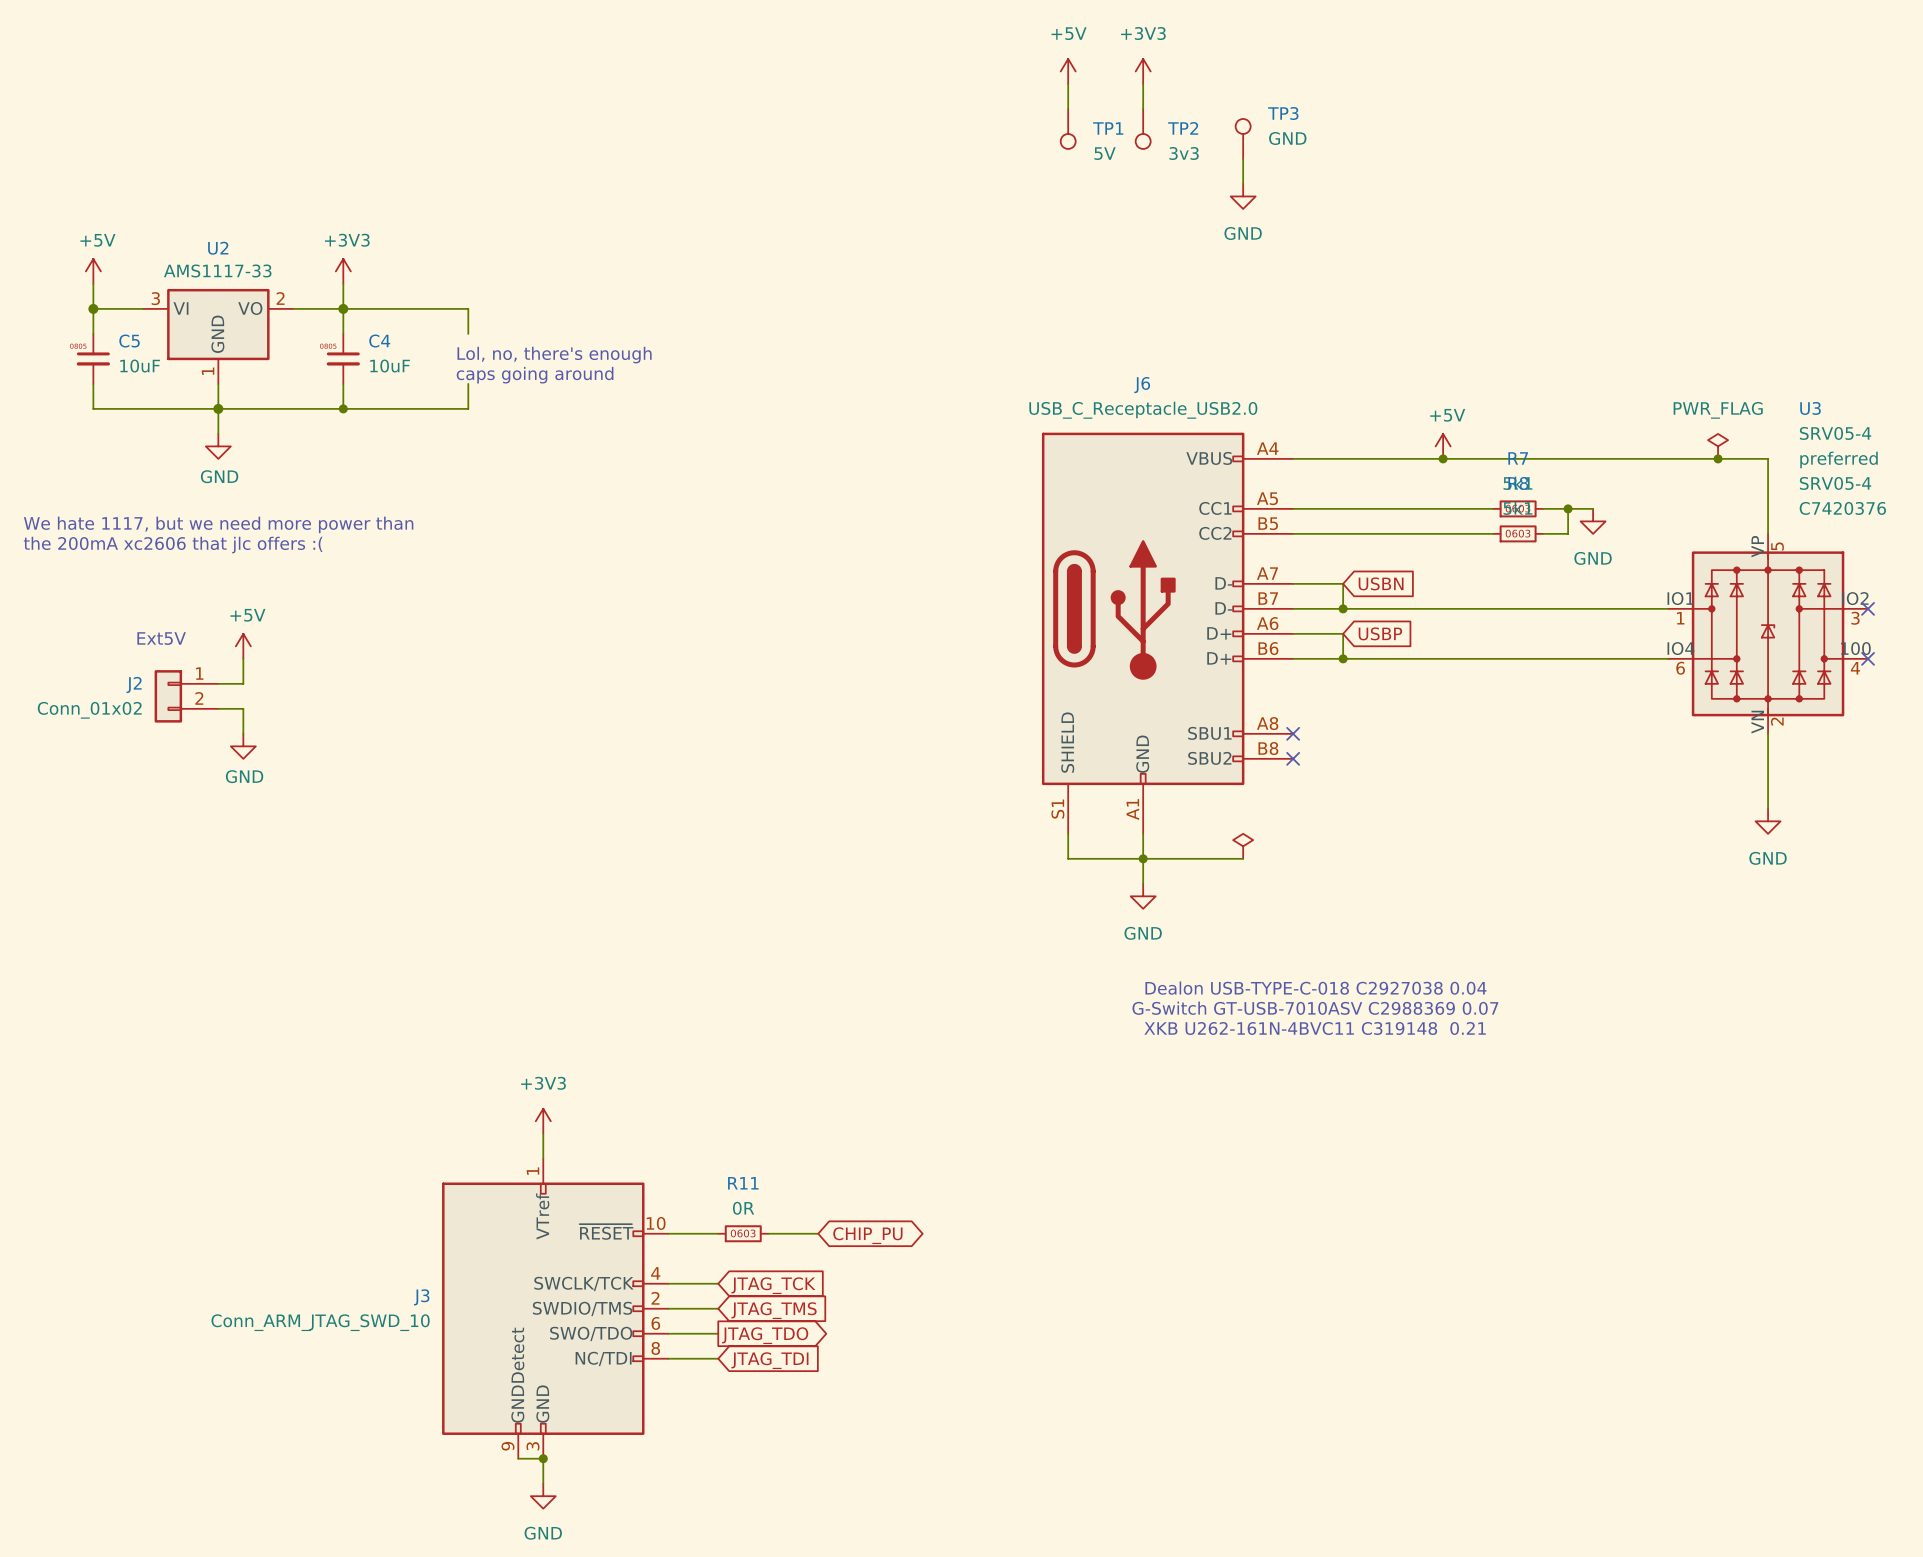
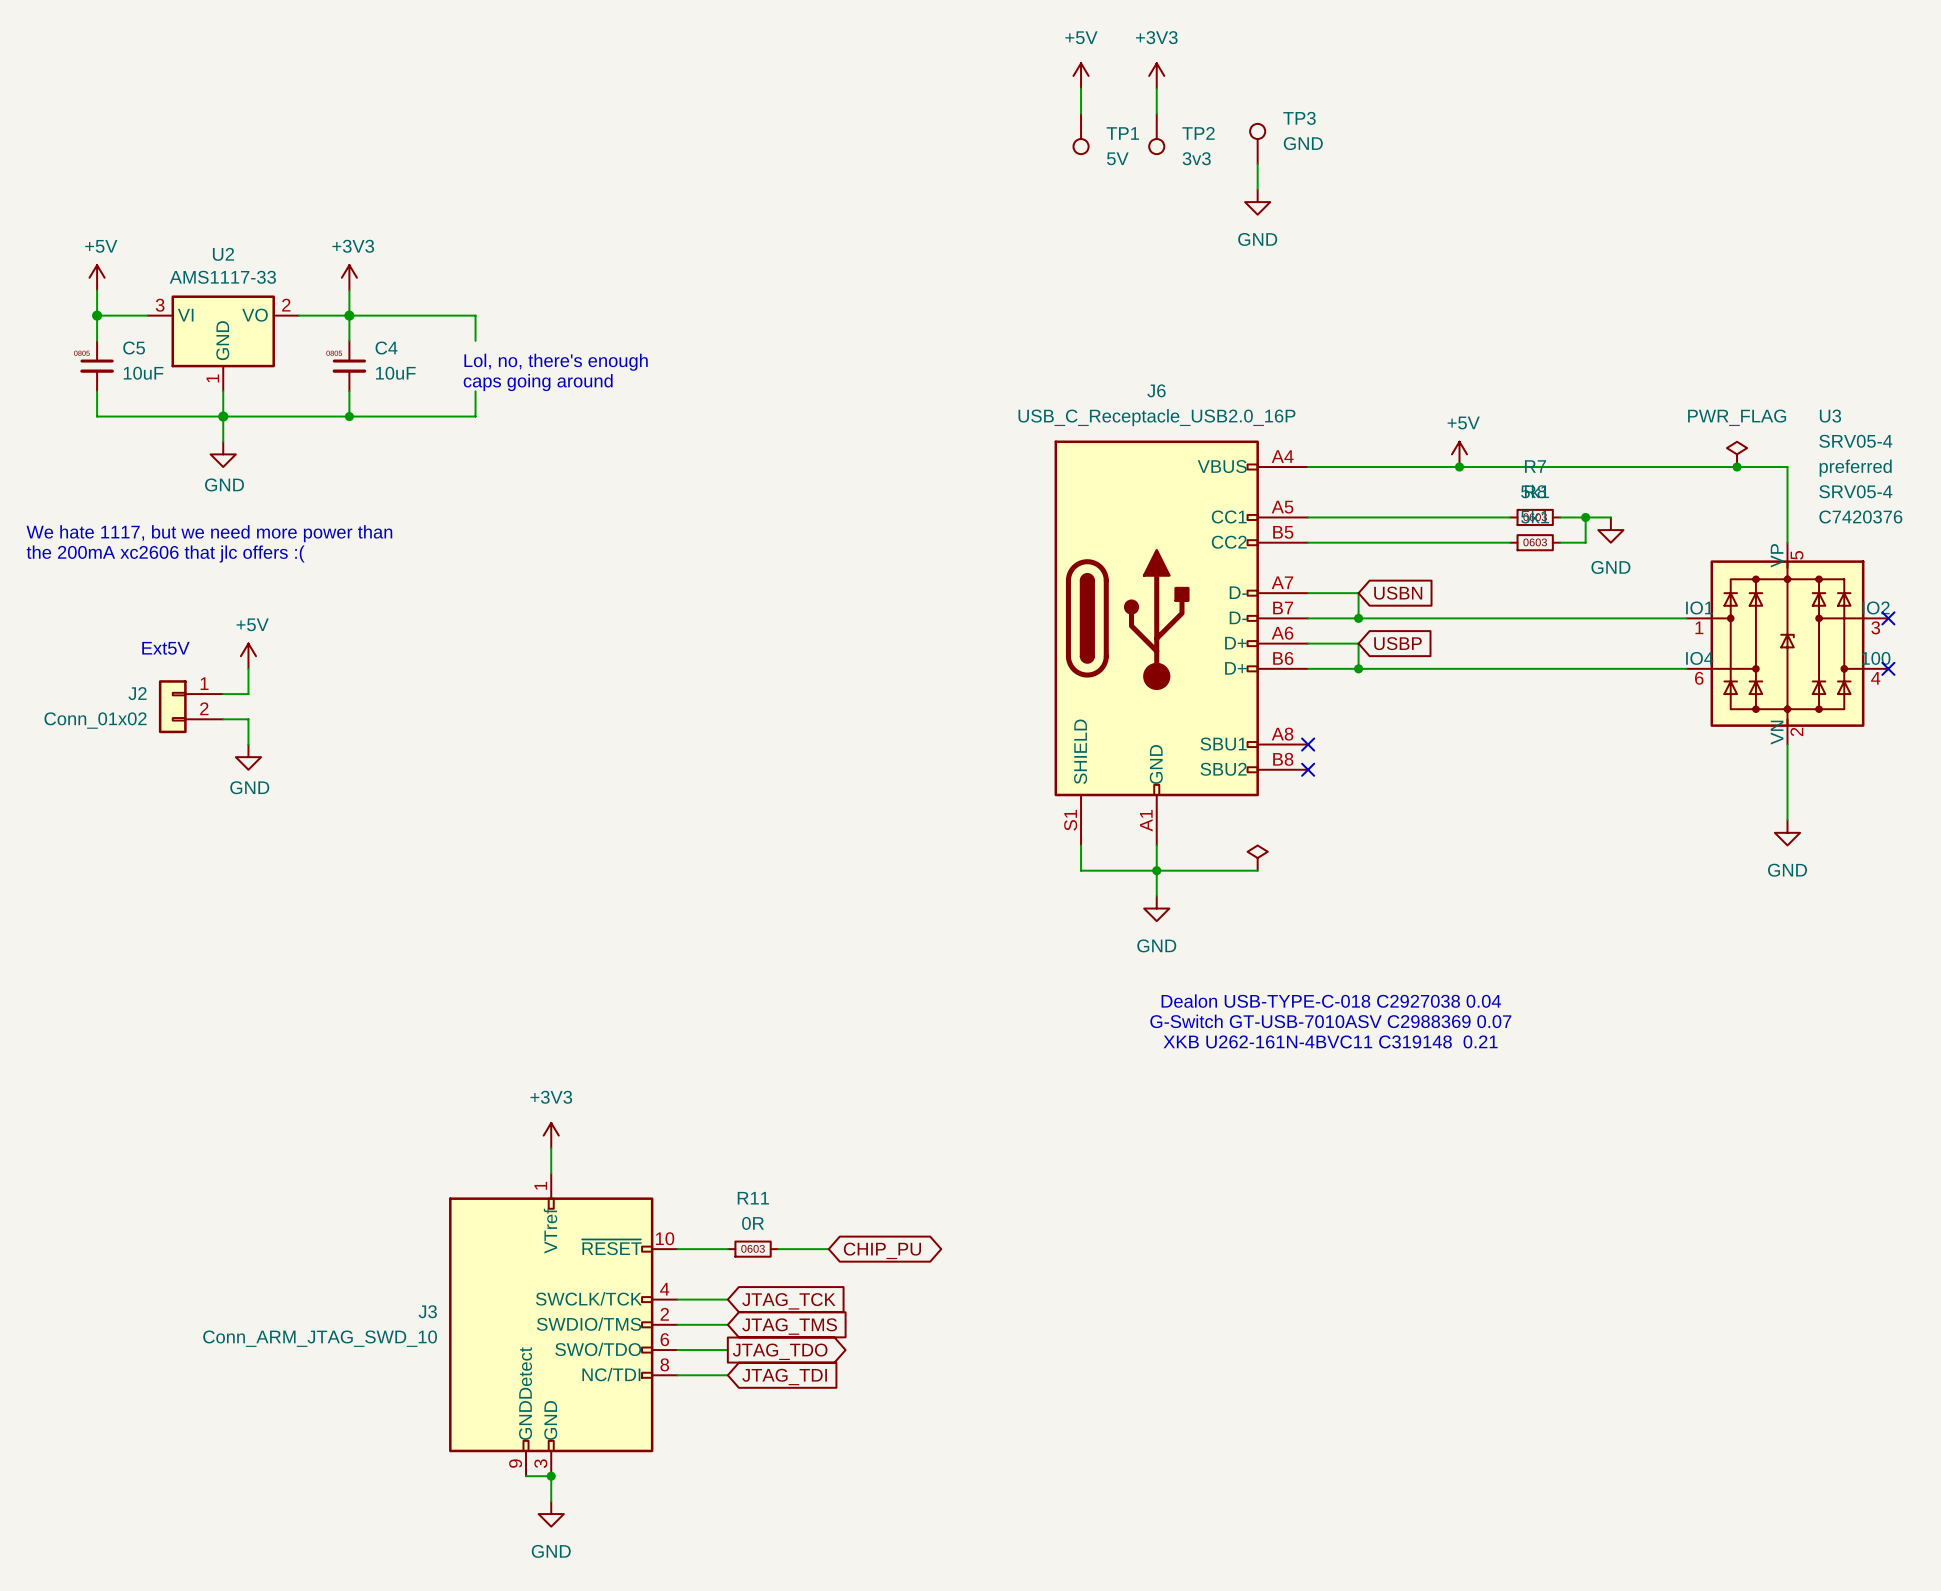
J6 value: USB_C_Receptacle_USB2.0 (1143, 410) -> USB_C_Receptacle_USB2.0_16P (1156, 417)

